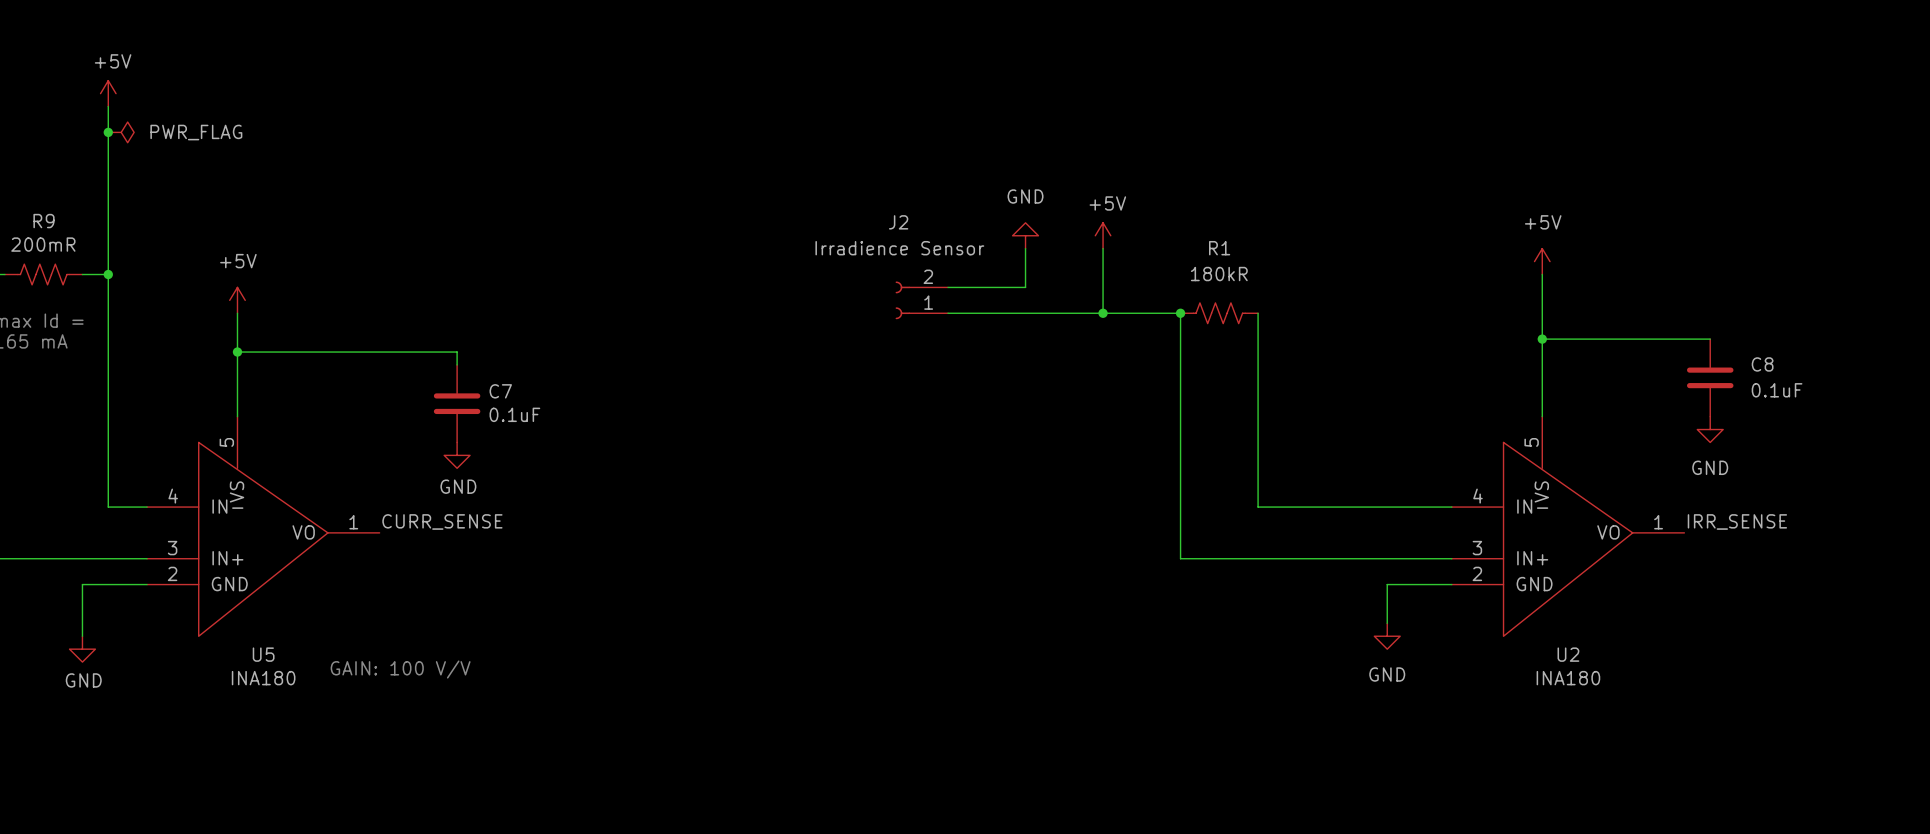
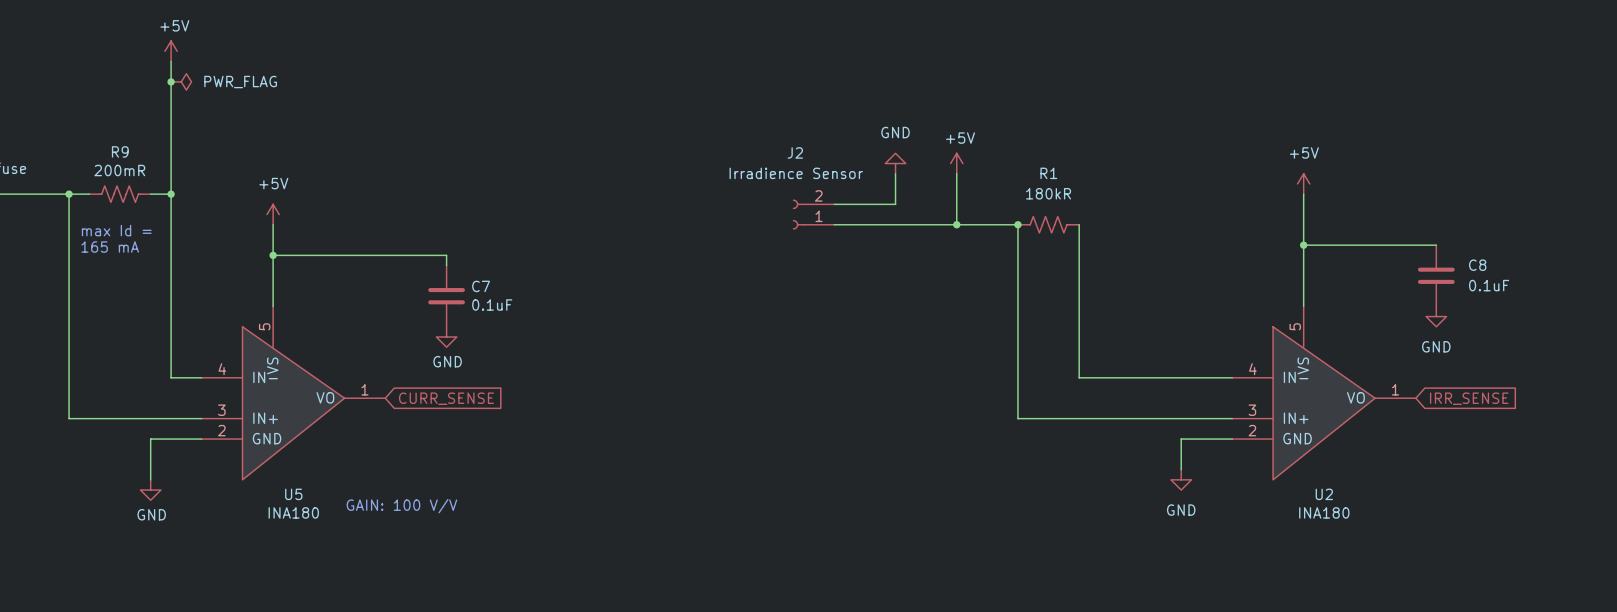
label: CURR_SENSE (442, 521) -> none
label: IRR_SENSE (1737, 521) -> none
global label: none -> CURR_SENSE (446, 398)
global label: none -> IRR_SENSE (1469, 398)

